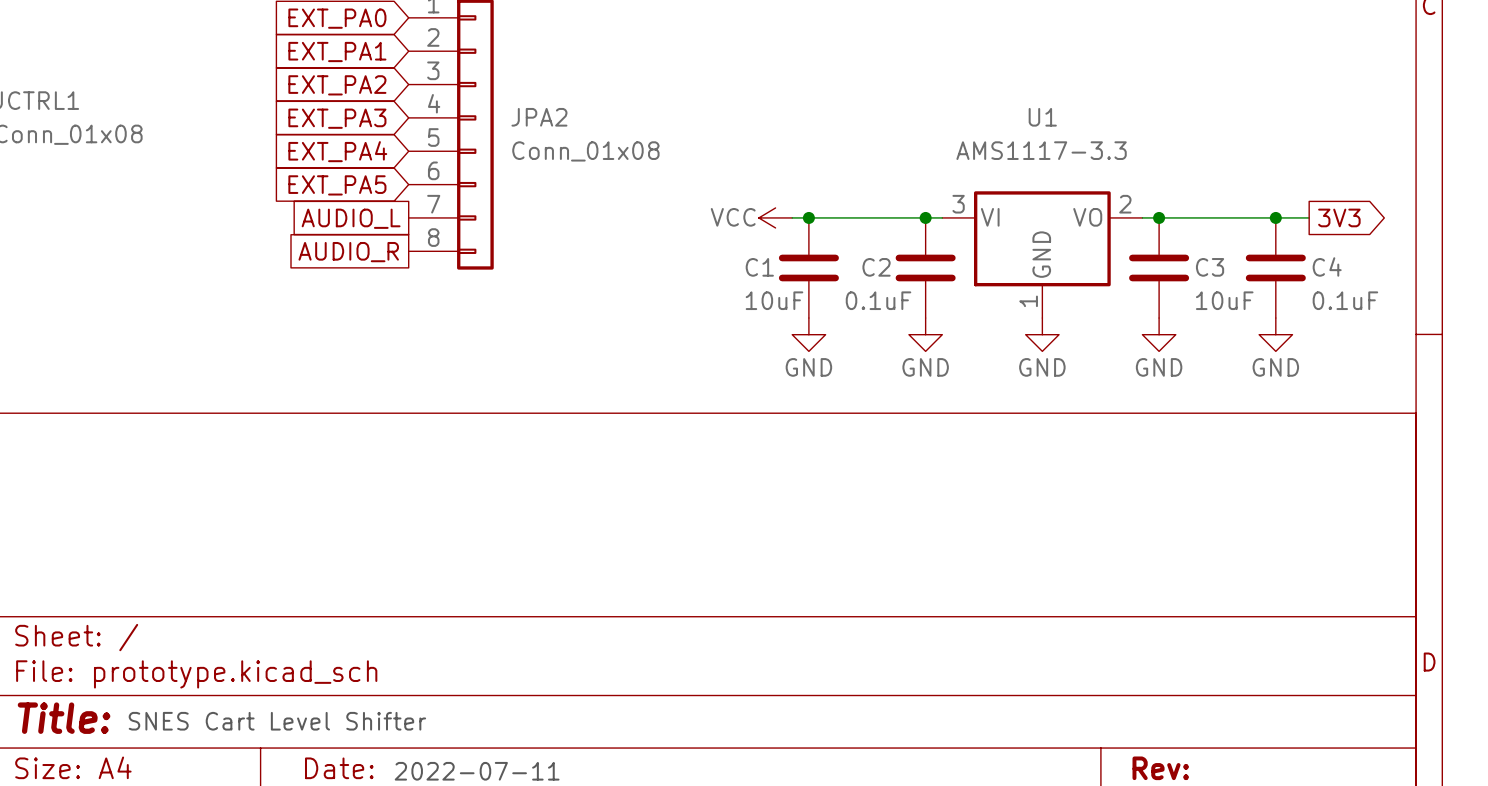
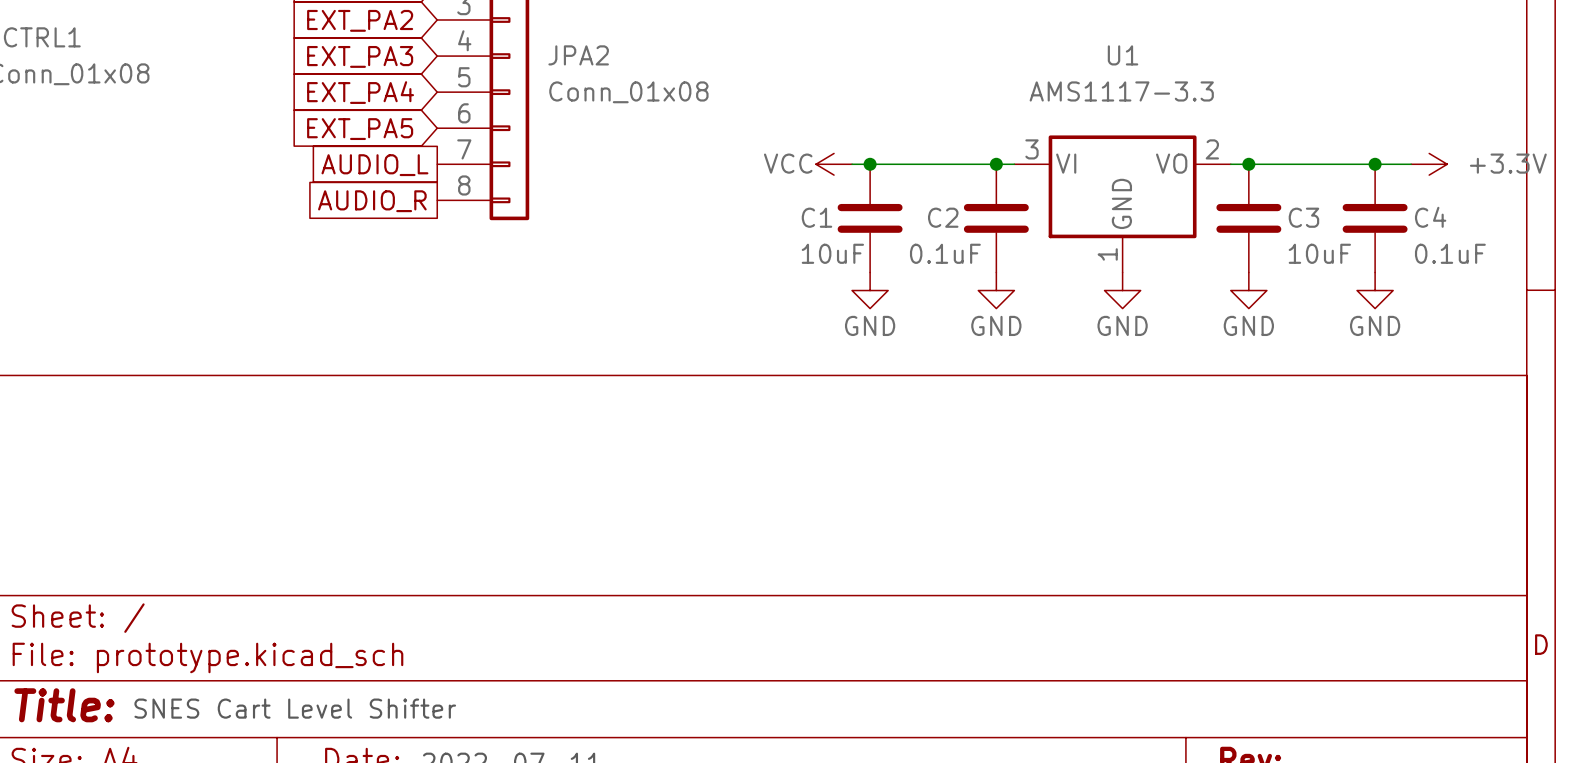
power symbol: none -> +3.3V (1429, 164)
global label: 3V3 (1339, 217) -> none

